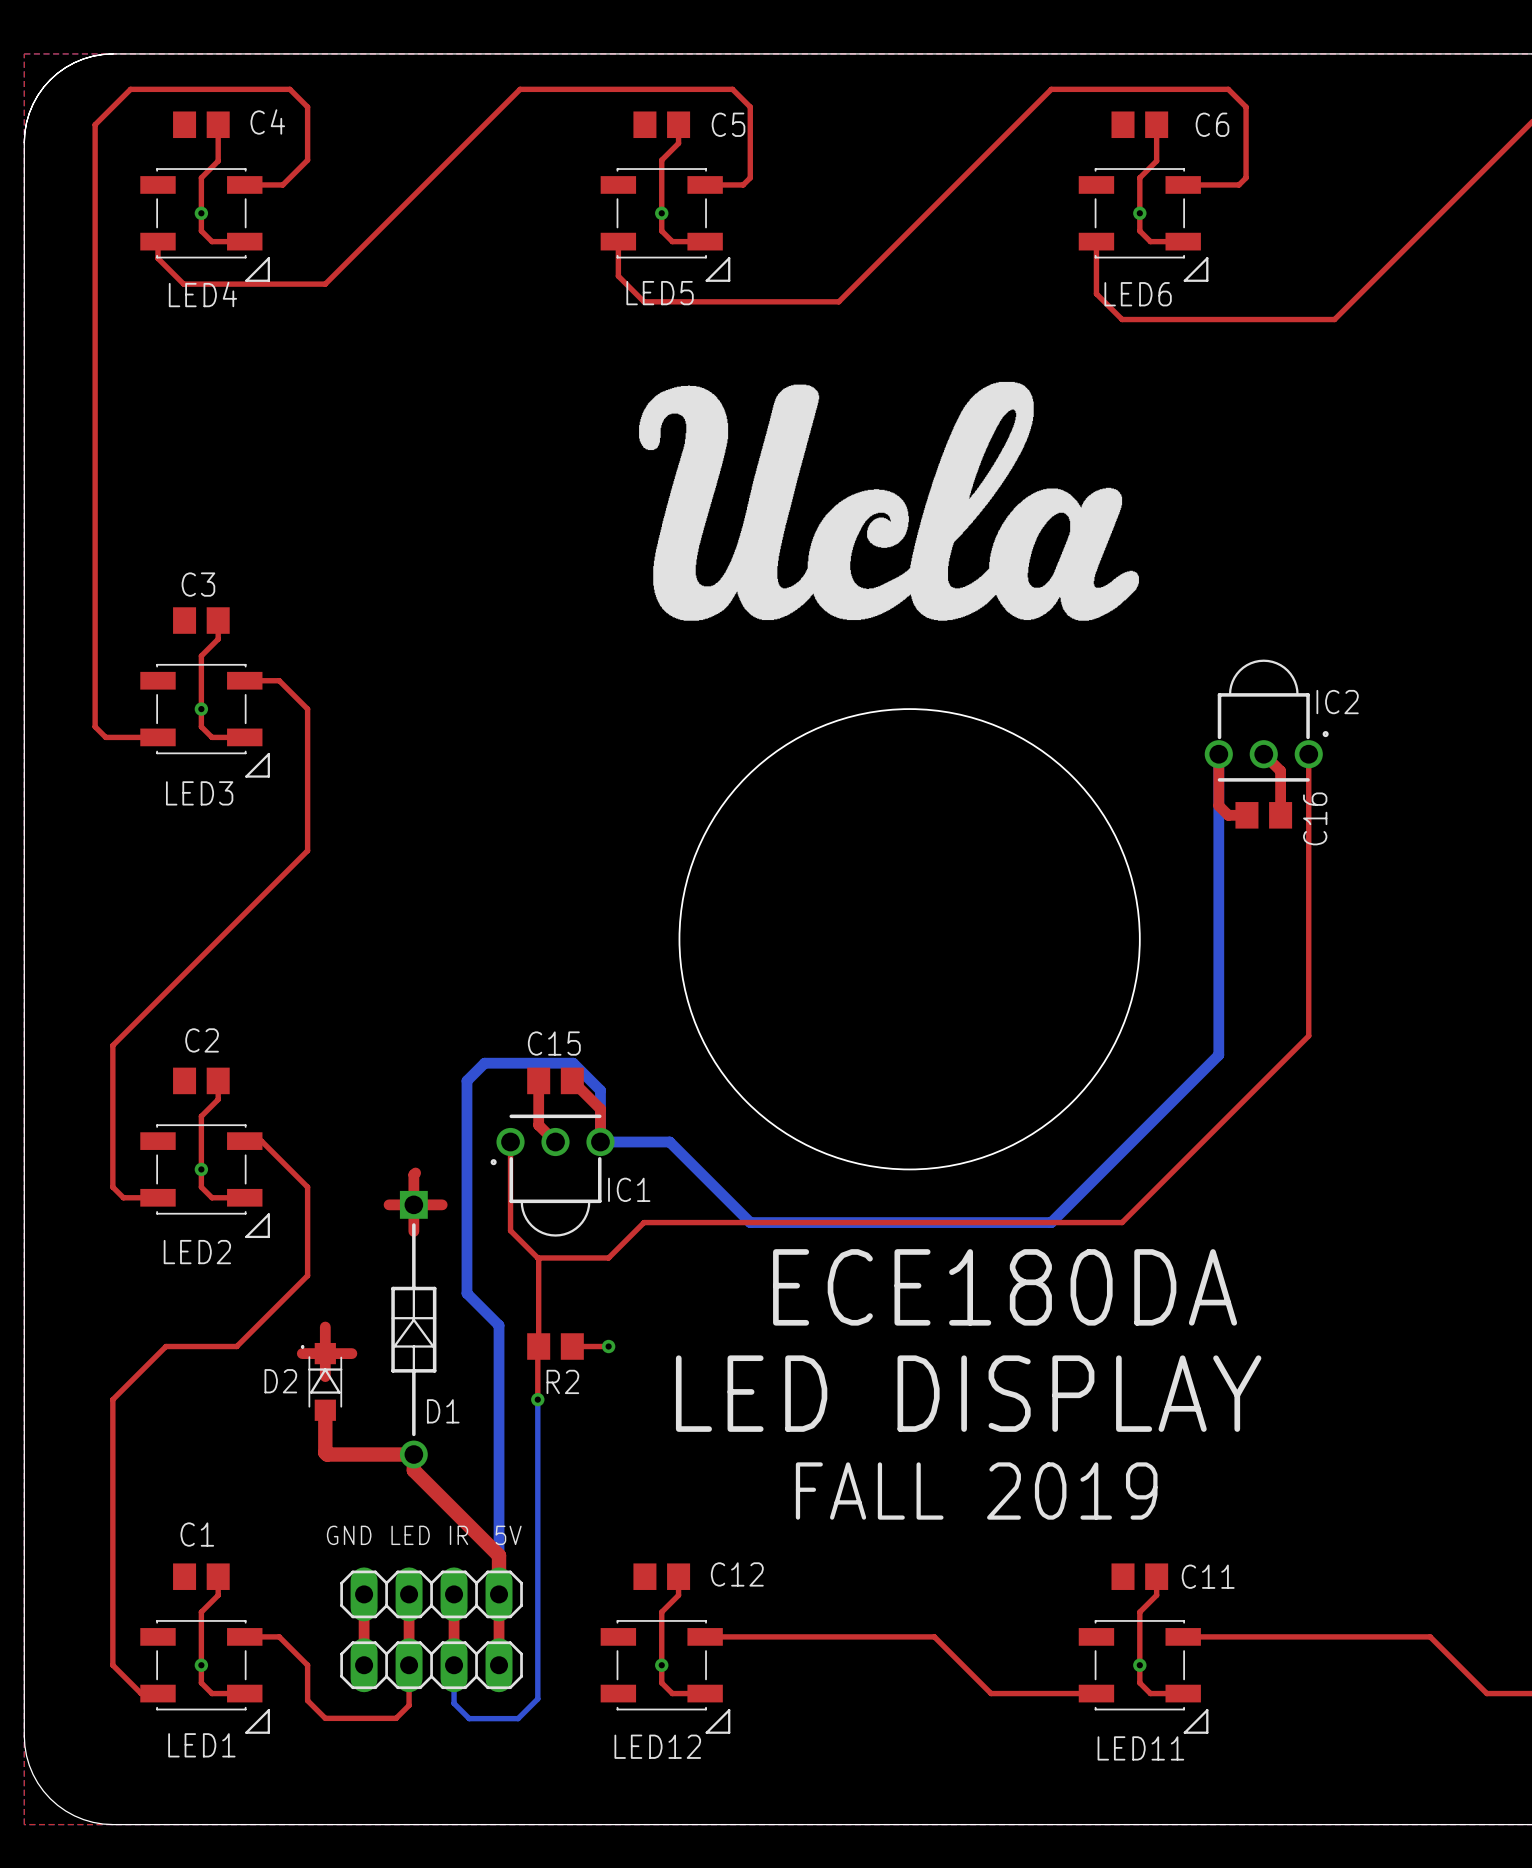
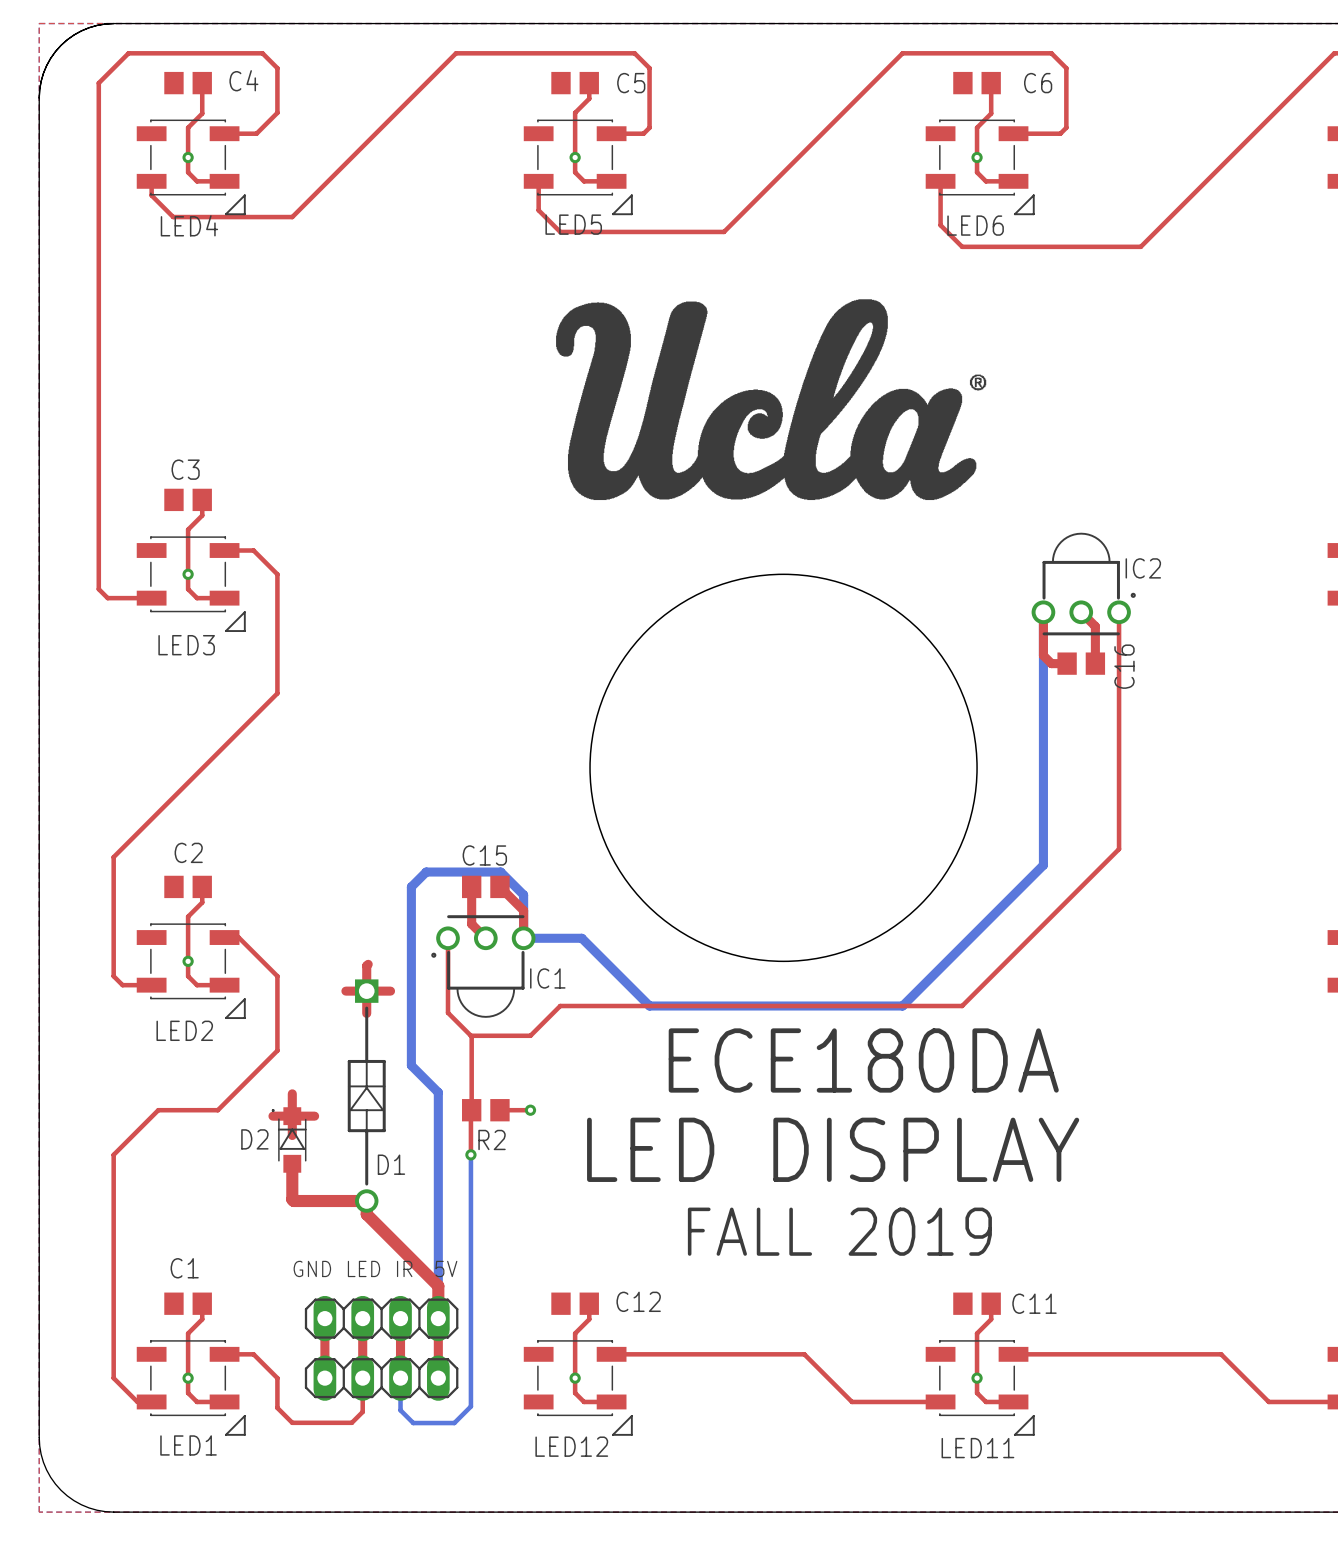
drawing: none -> [969, 374, 987, 391]

